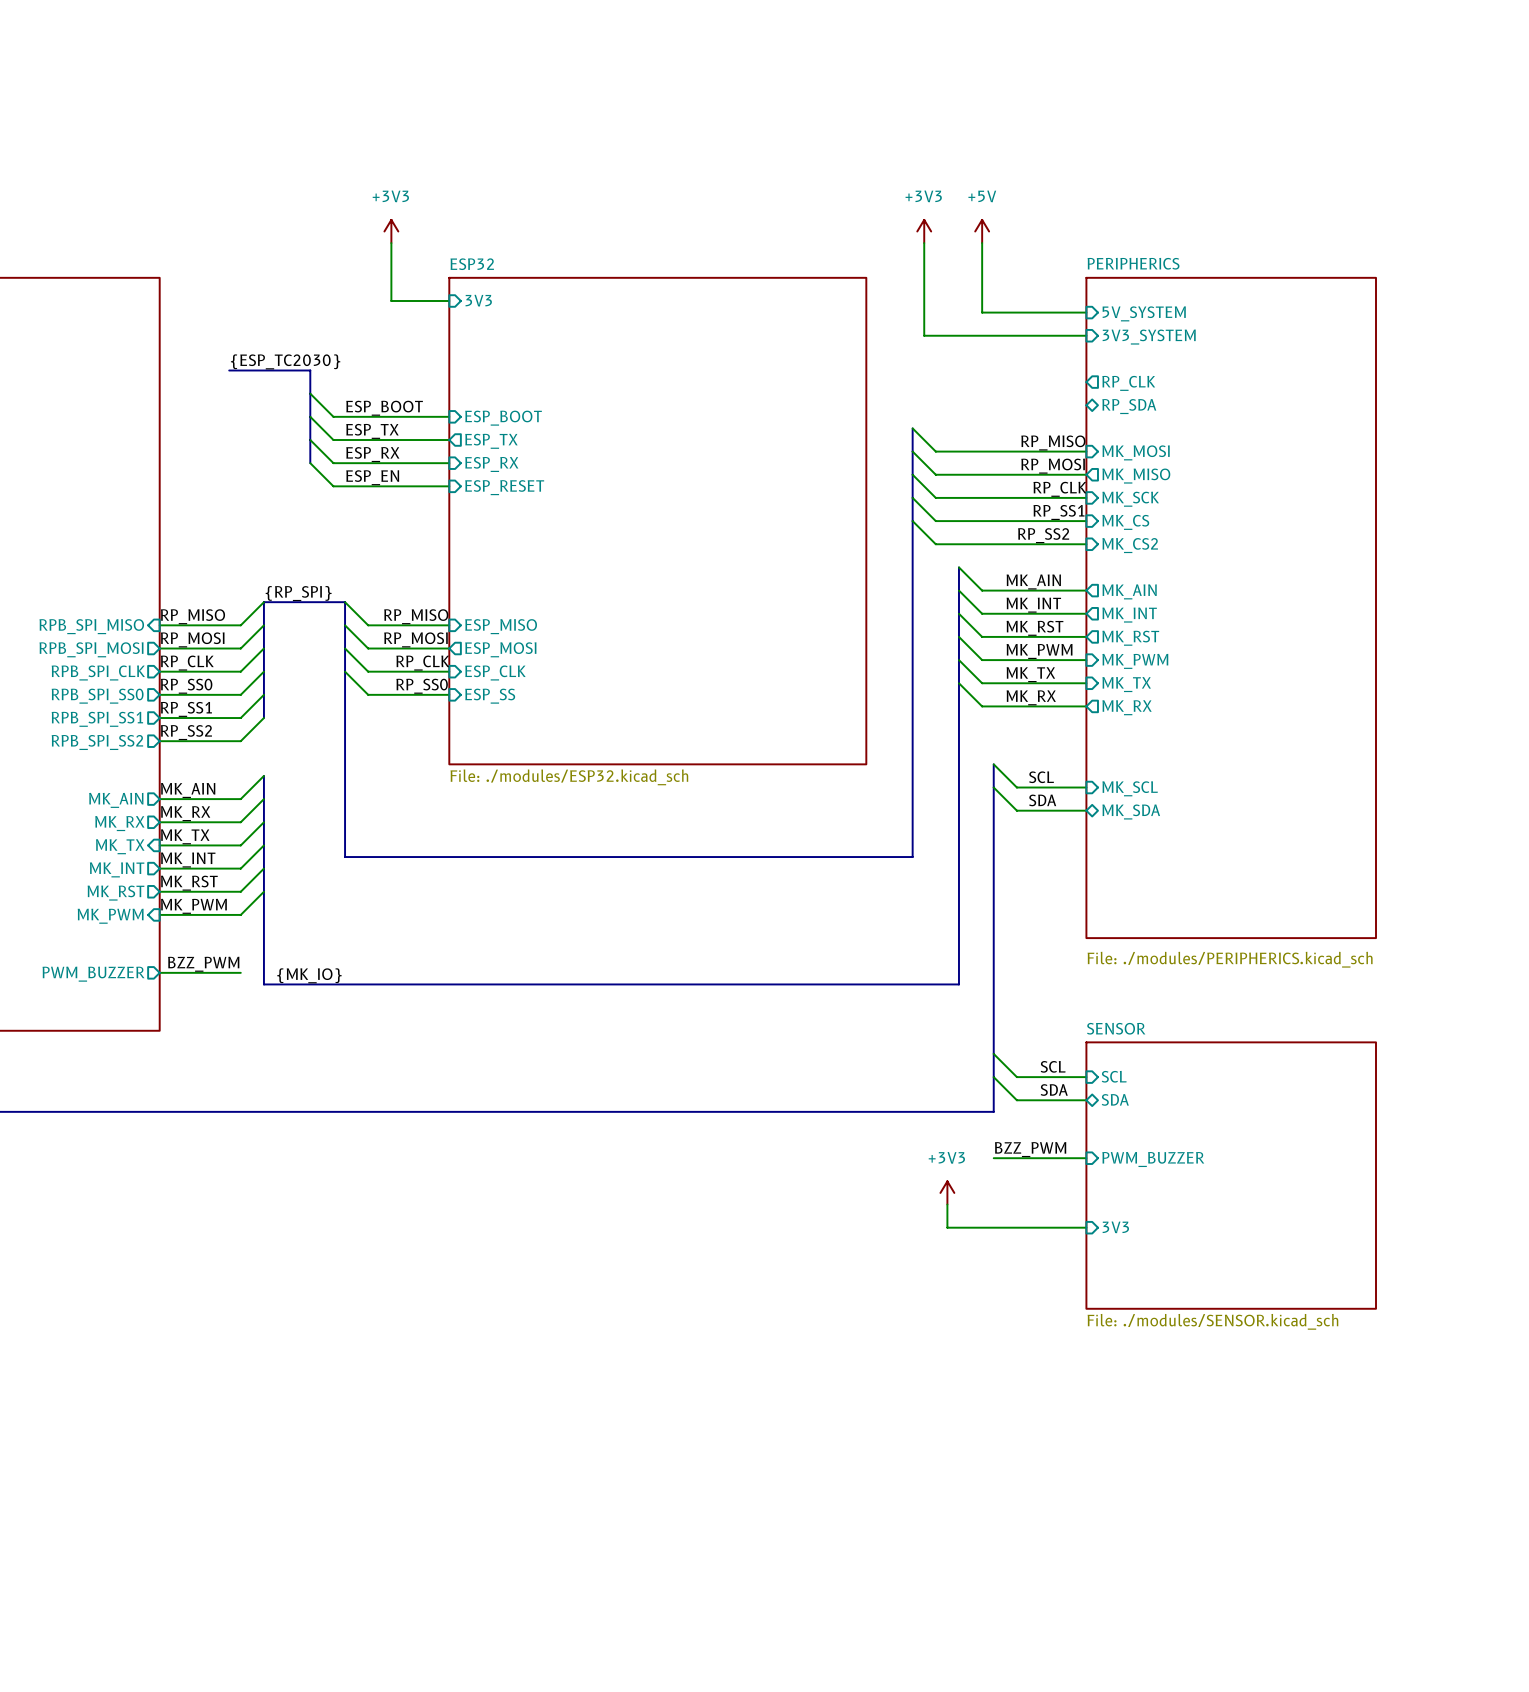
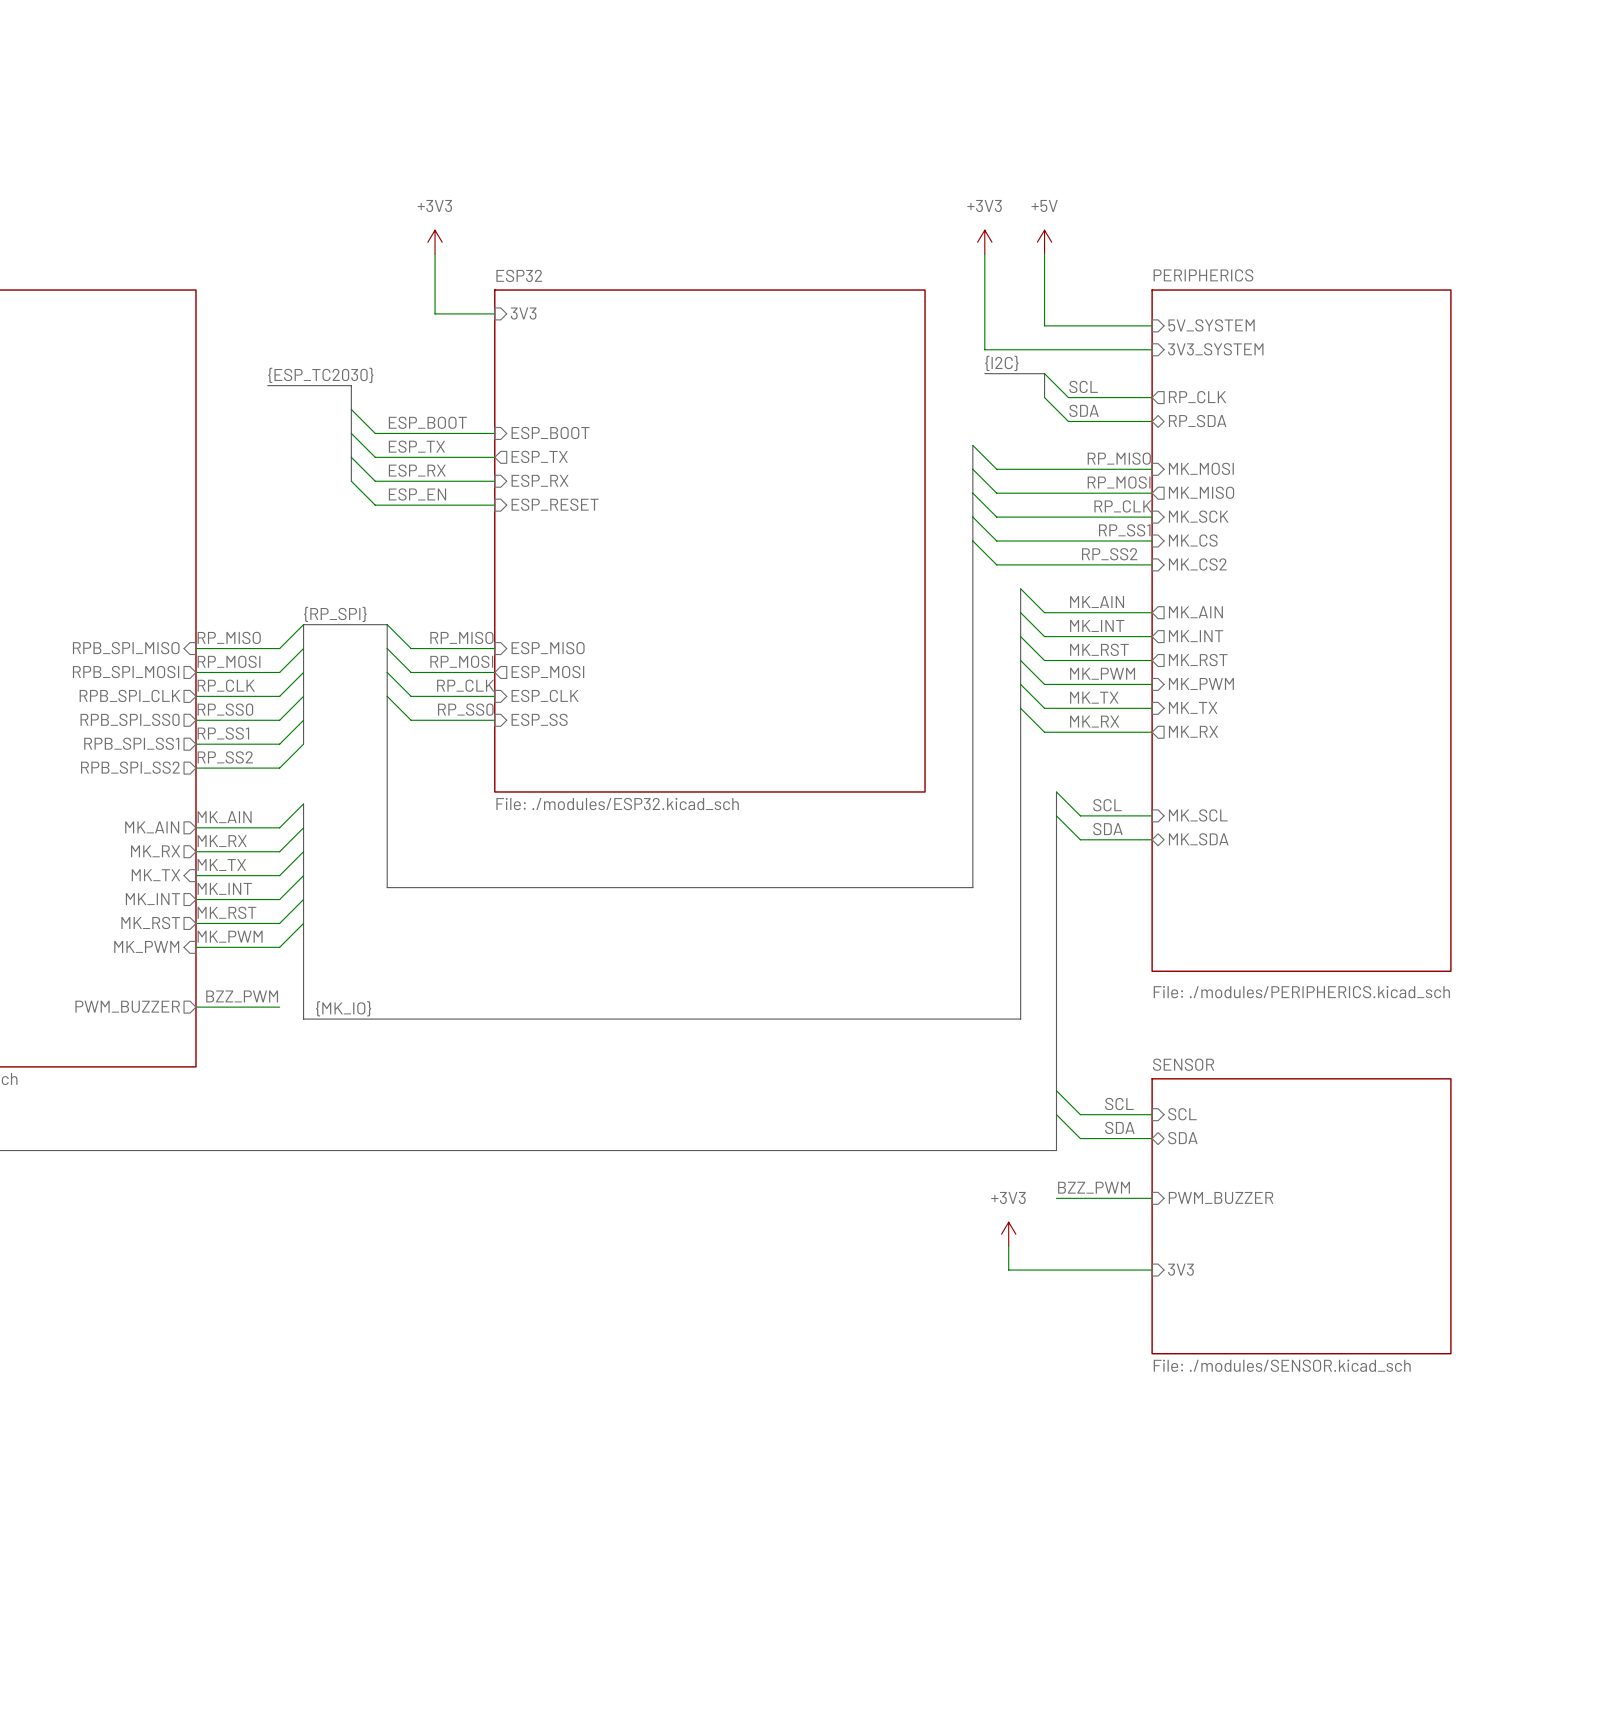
label: none -> {I2C} (1001, 363)
bus: none -> (984, 373) (1044, 373) (1044, 397)
wire: none -> (1044, 373) (1068, 397) (1152, 397)
label: none -> SCL (1083, 386)
wire: none -> (1044, 397) (1068, 421) (1152, 421)
label: none -> SDA (1084, 410)

